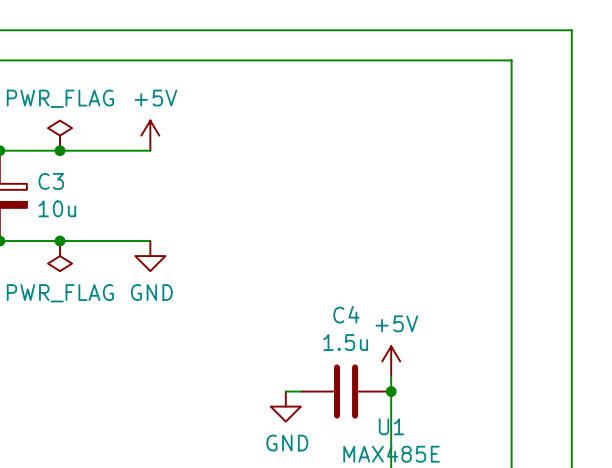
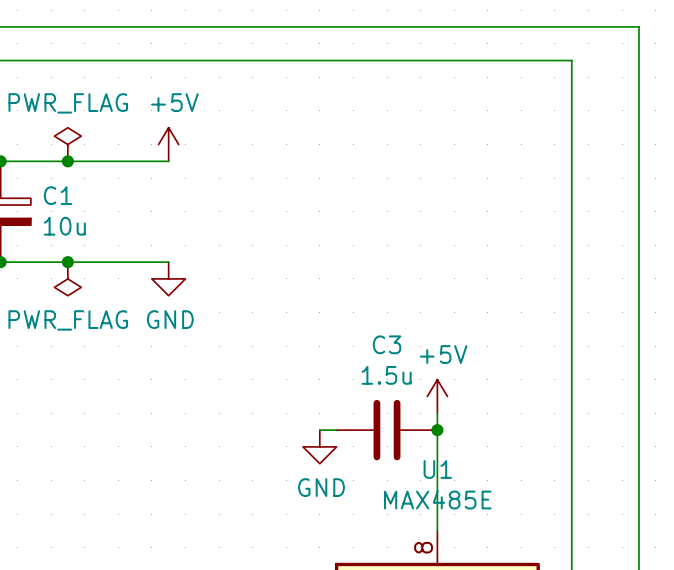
C3 name: C3 (51, 181) -> C1 (58, 195)
C4 name: C4 (346, 314) -> C3 (387, 344)

